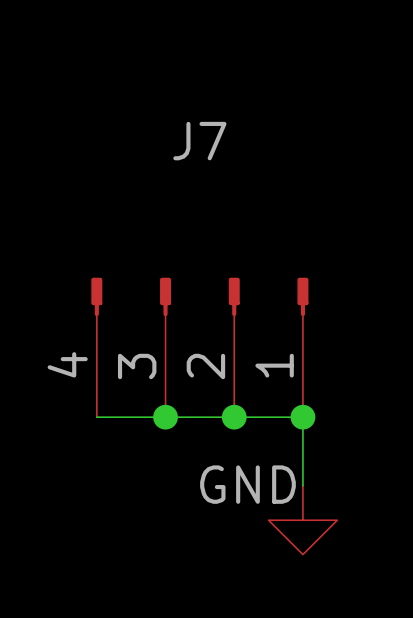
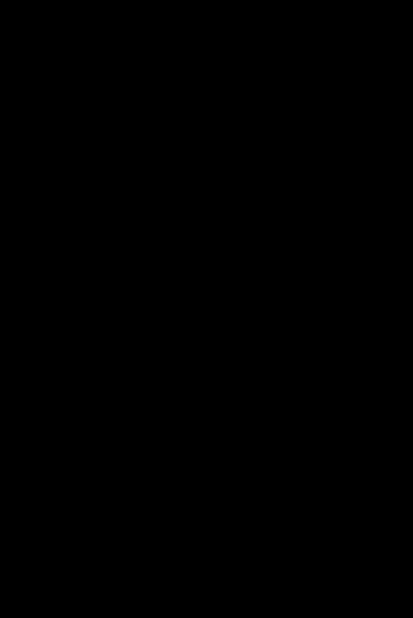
J7: (199, 347) -> none
wire: (96, 417) (302, 417) (302, 485) -> none
junction: (165, 417) -> none
junction: (234, 417) -> none
junction: (302, 417) -> none
power symbol: GND (302, 520) -> none

